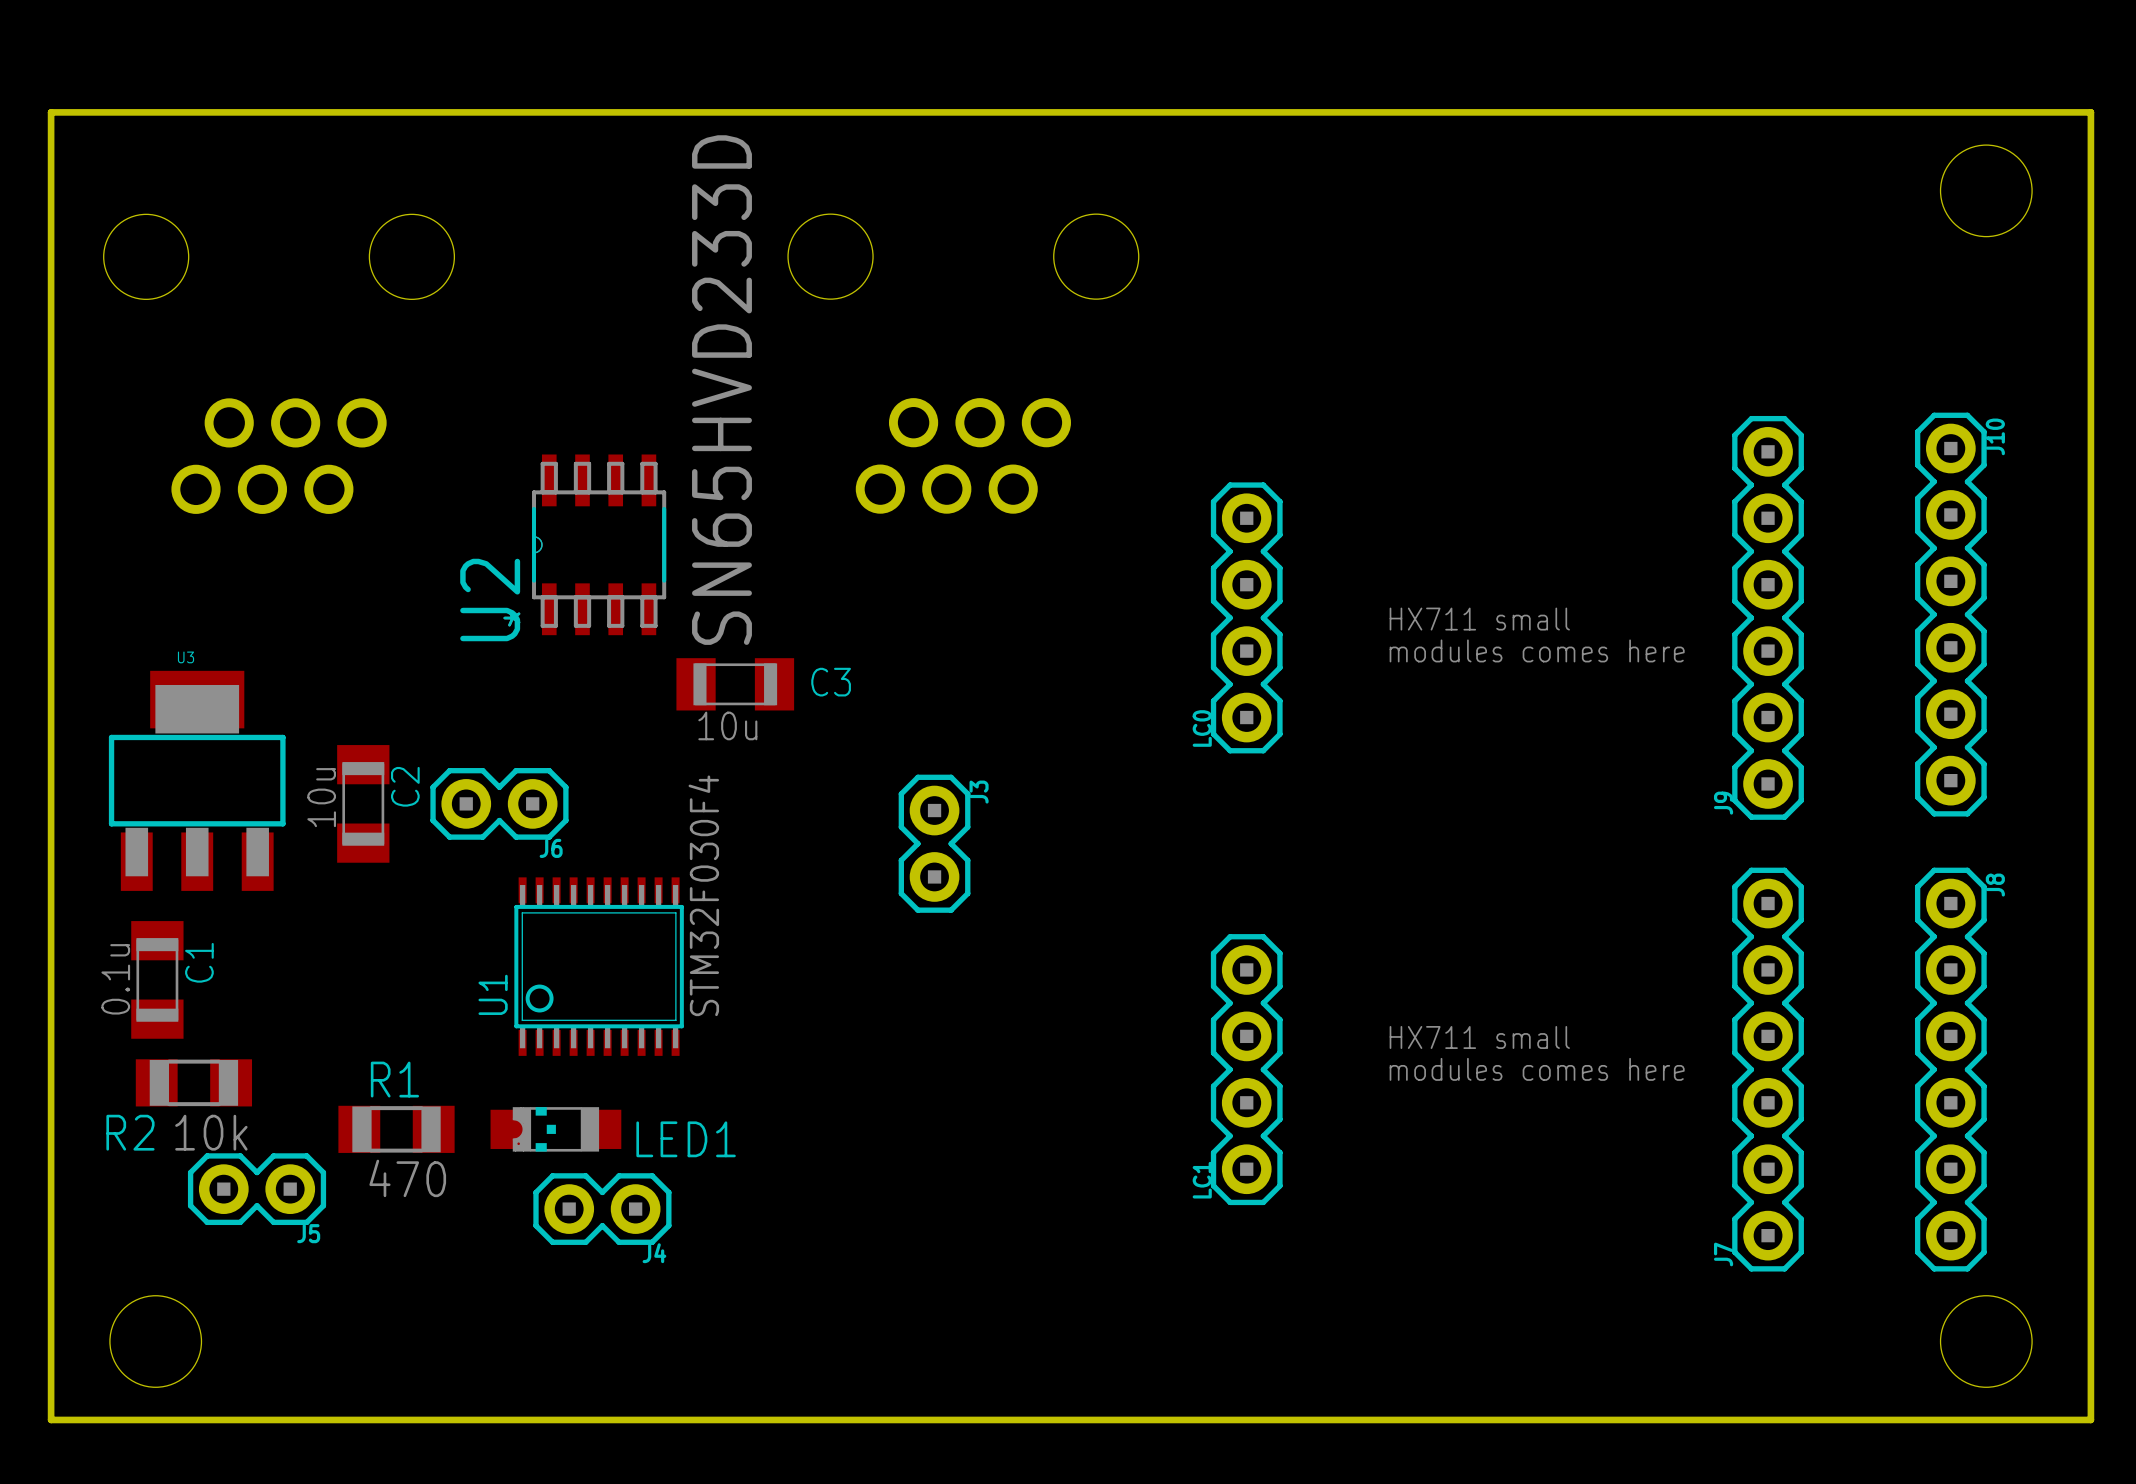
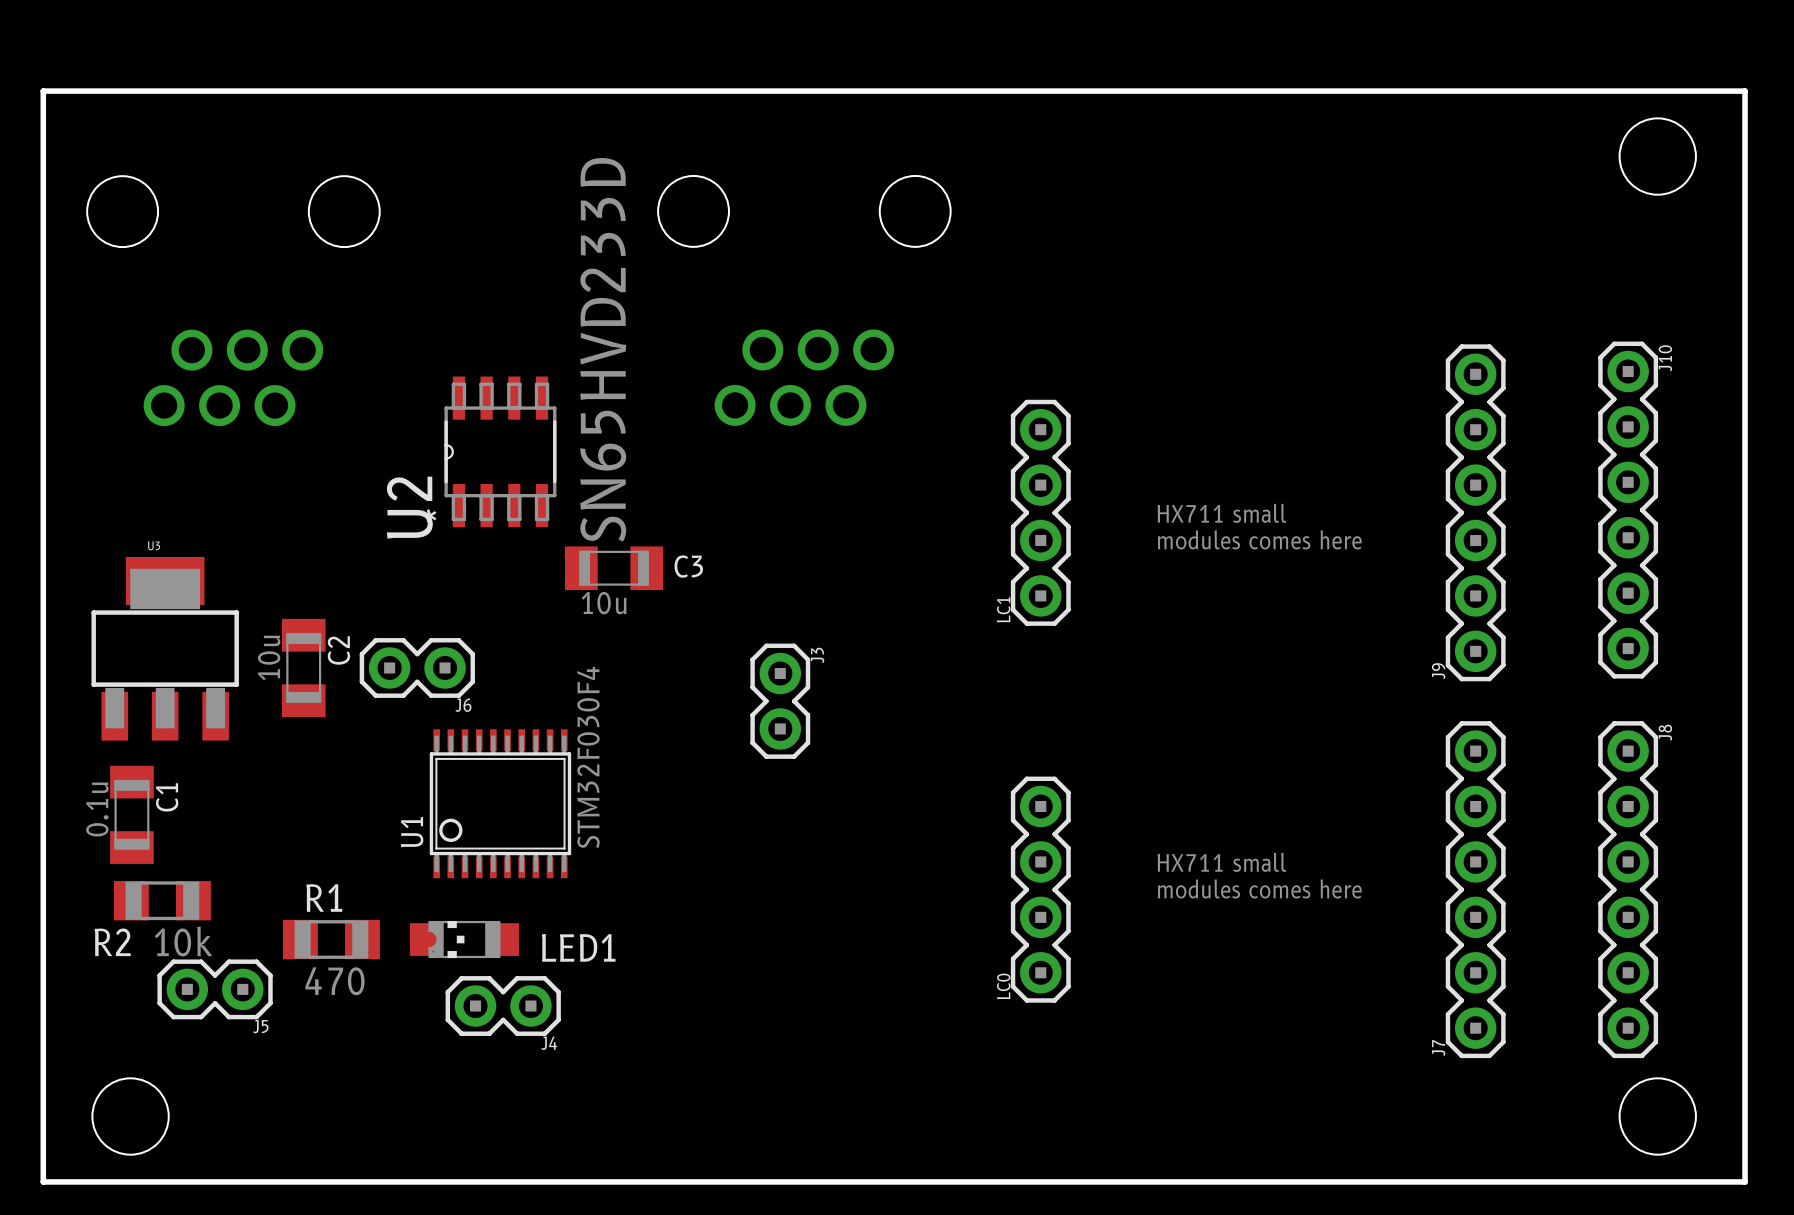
LC0 name: LC0 (1202, 728) -> LC1 (1003, 609)
LC1 name: LC1 (1202, 1180) -> LC0 (1003, 986)

